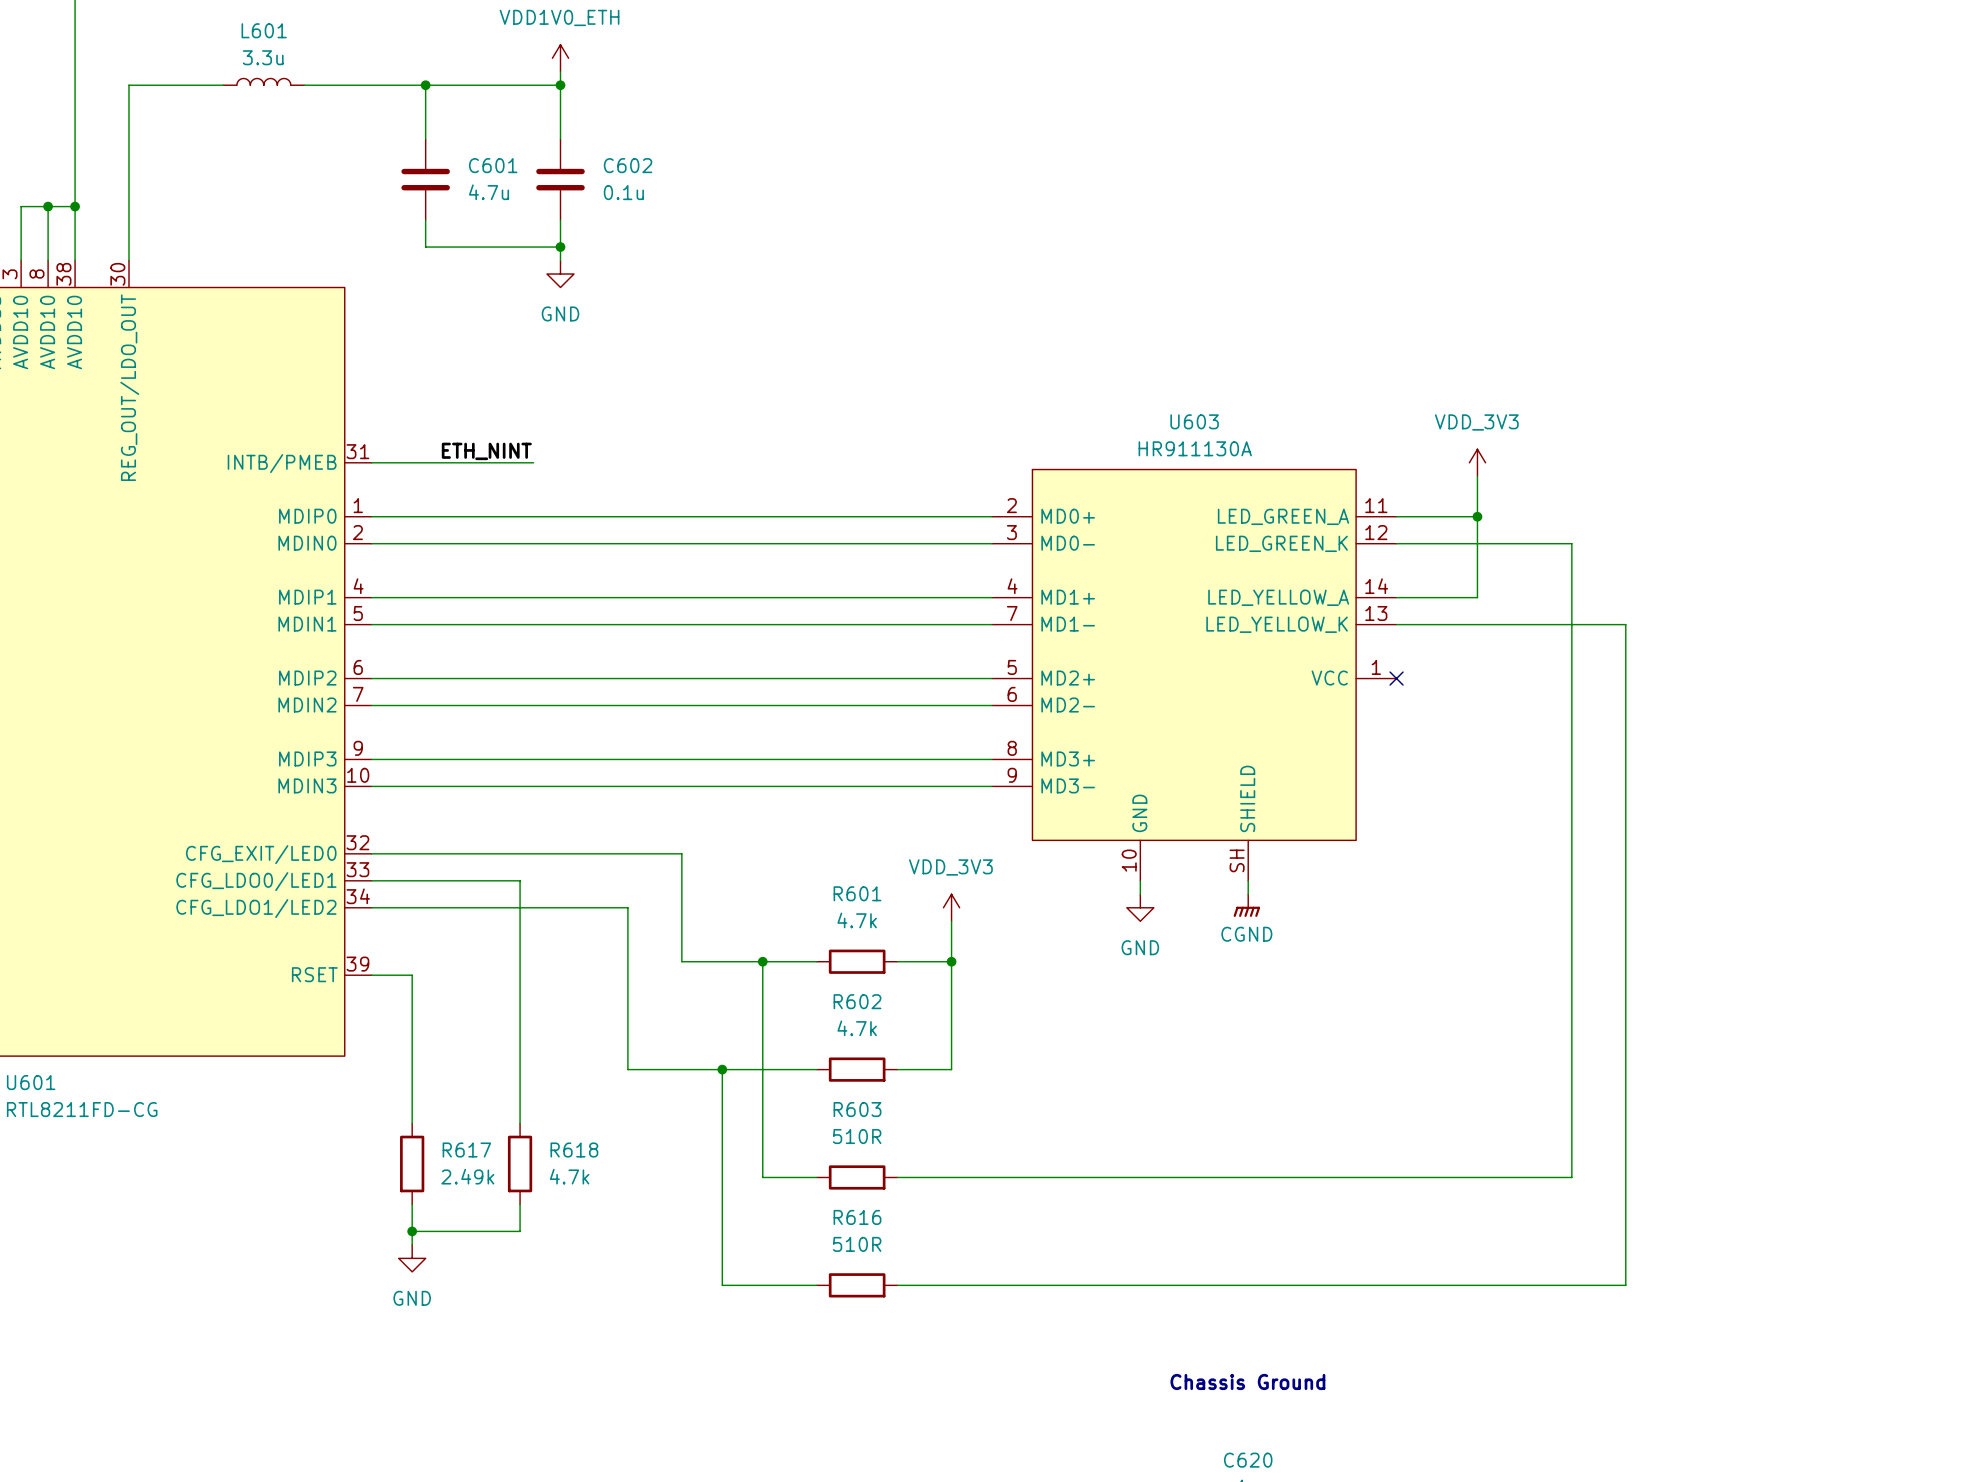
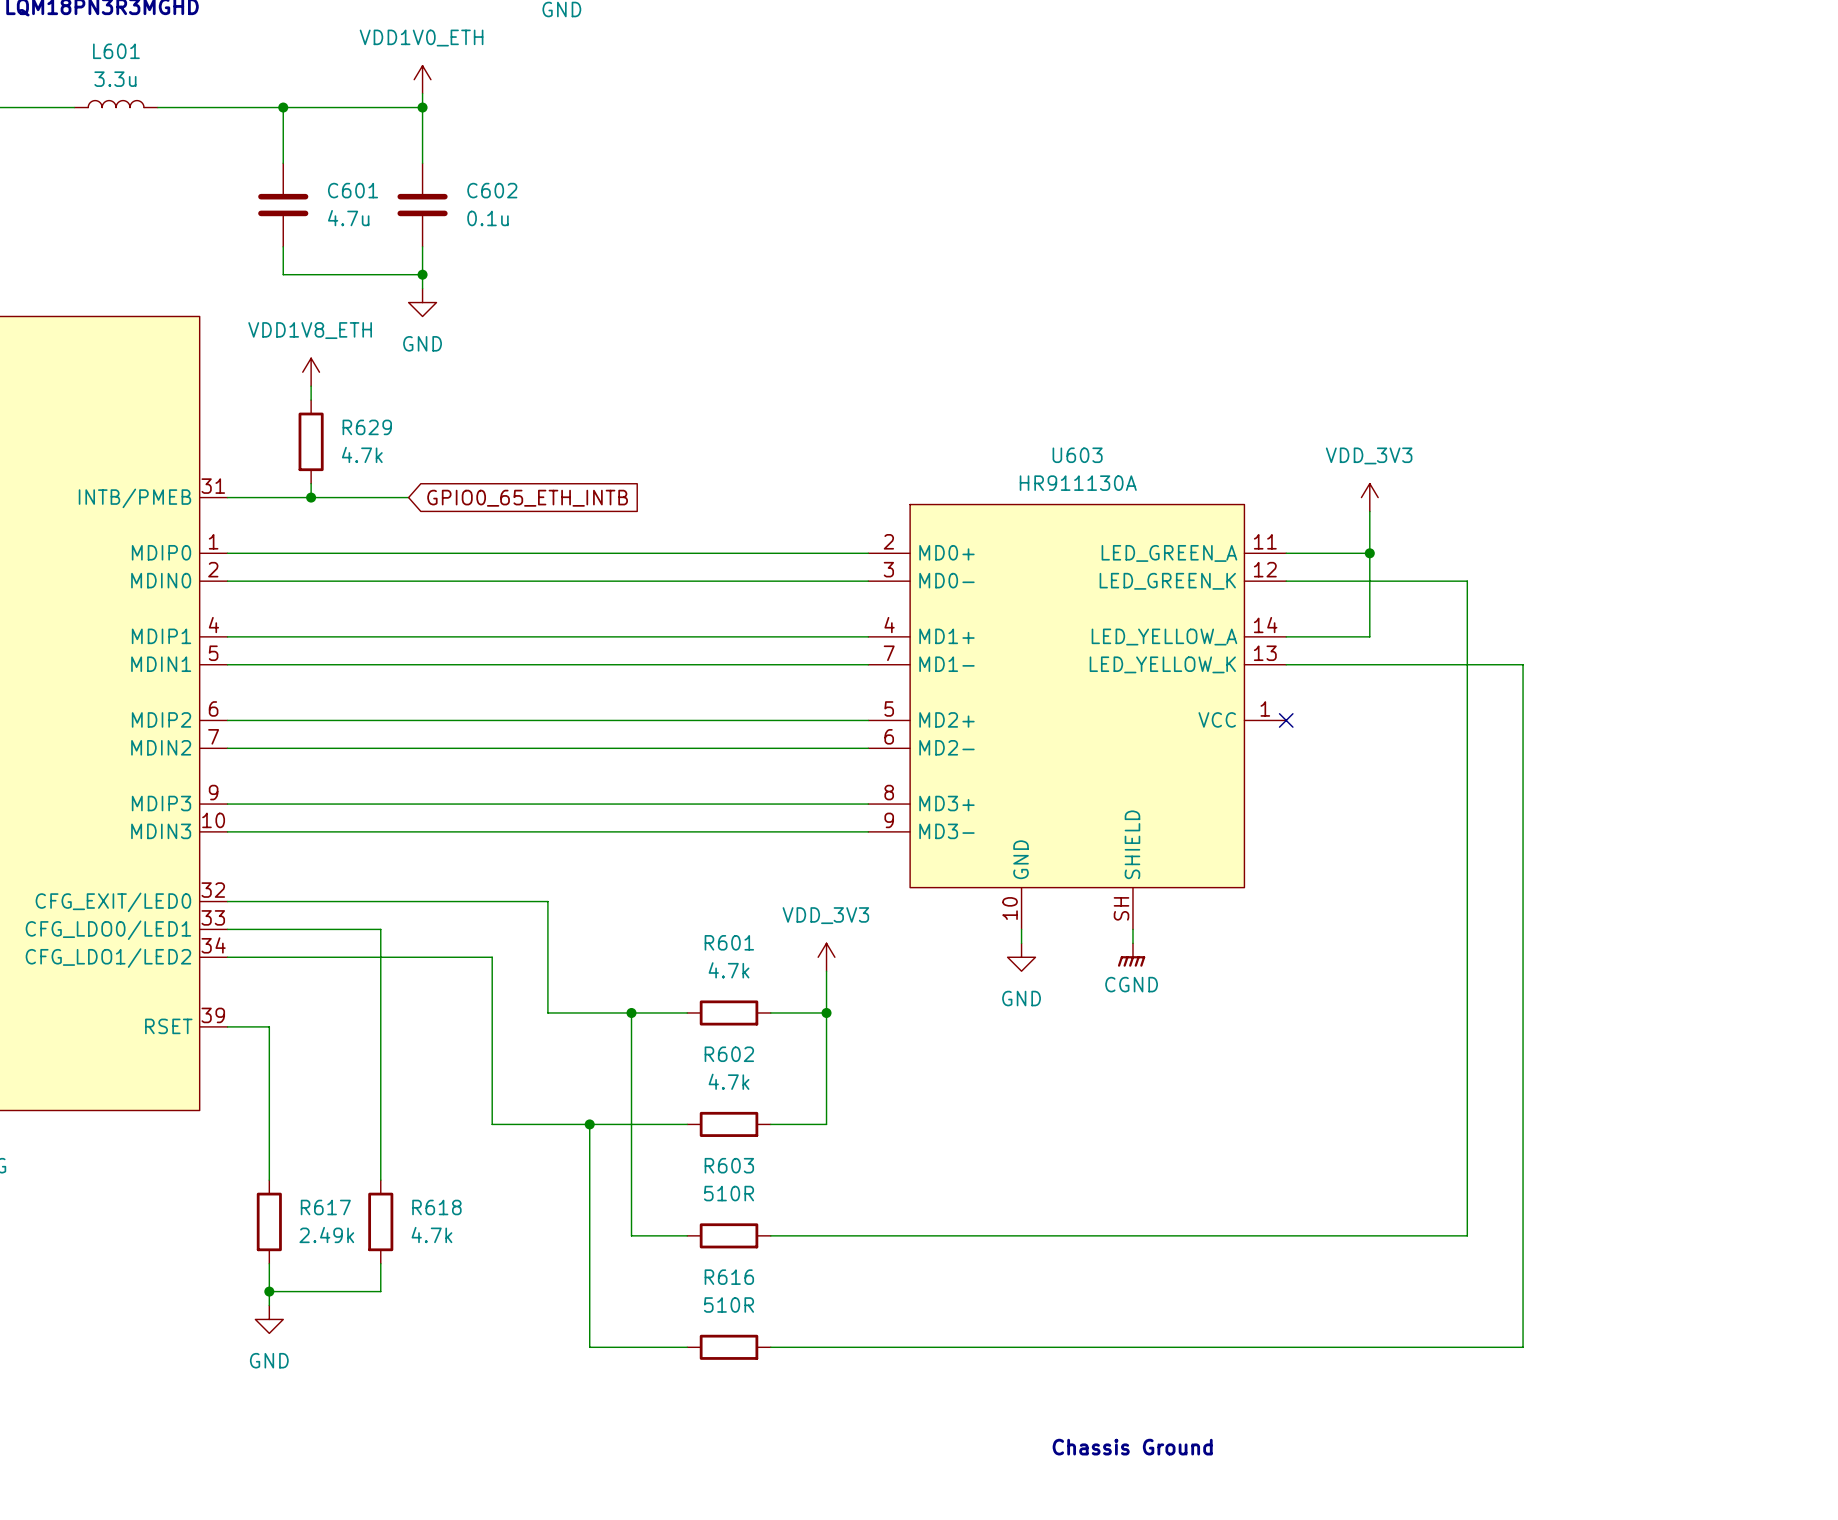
power symbol: none -> VDD1V8_ETH (311, 372)
wire: none -> (311, 386) (311, 400)
R629: none -> 4.7k (311, 441)
wire: none -> (311, 483) (311, 497)
label: ETH_NINT (486, 451) -> none
junction: none -> (311, 497)
wire: none -> (394, 497) (408, 497)
global label: none -> GPIO0_65_ETH_INTB (527, 498)

